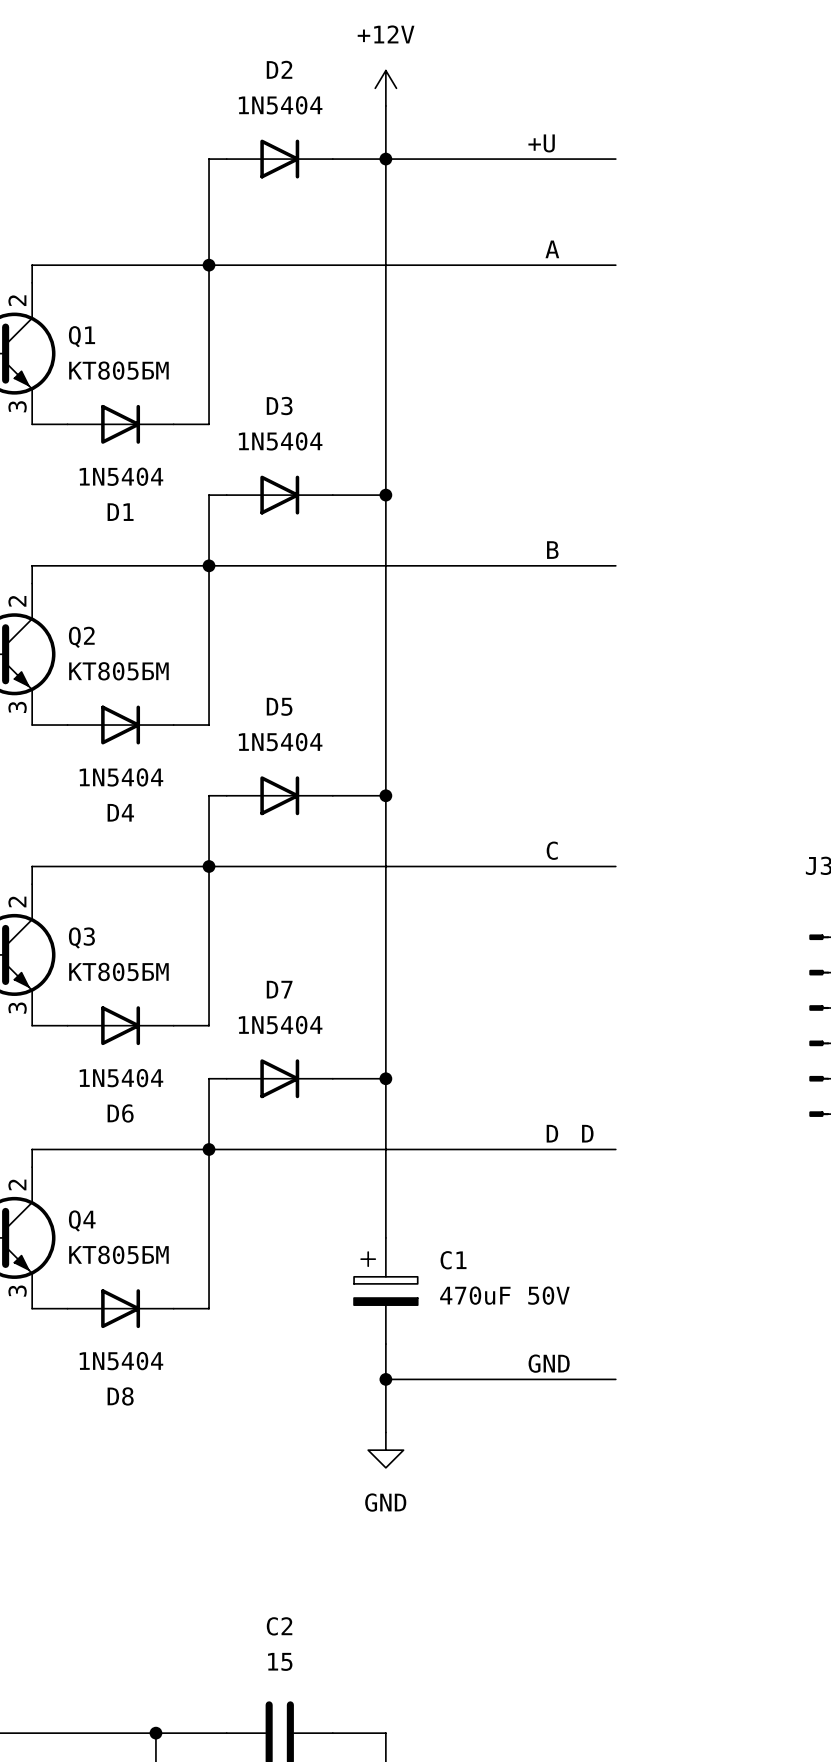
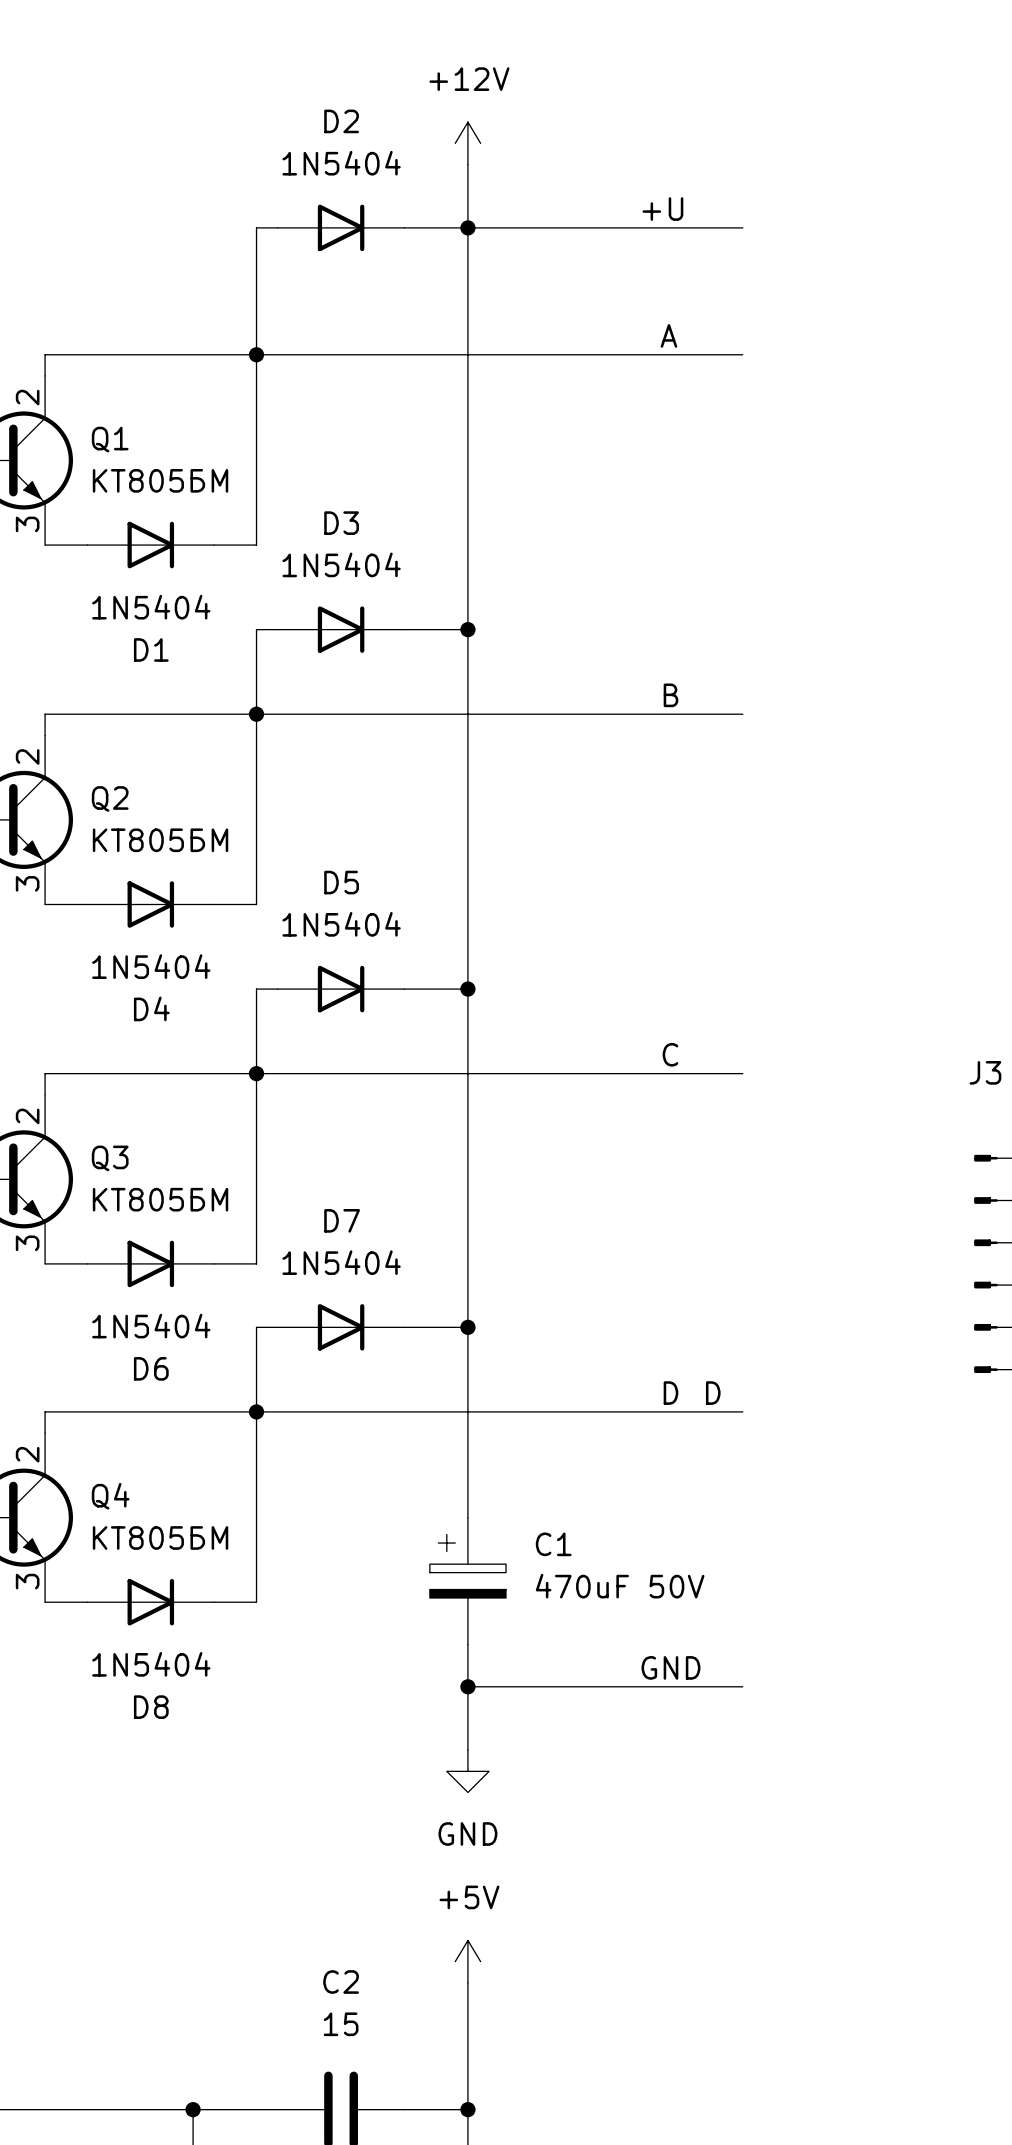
power symbol: none -> +5V (467, 1961)
wire: none -> (467, 1982) (467, 2109)
junction: none -> (467, 2109)

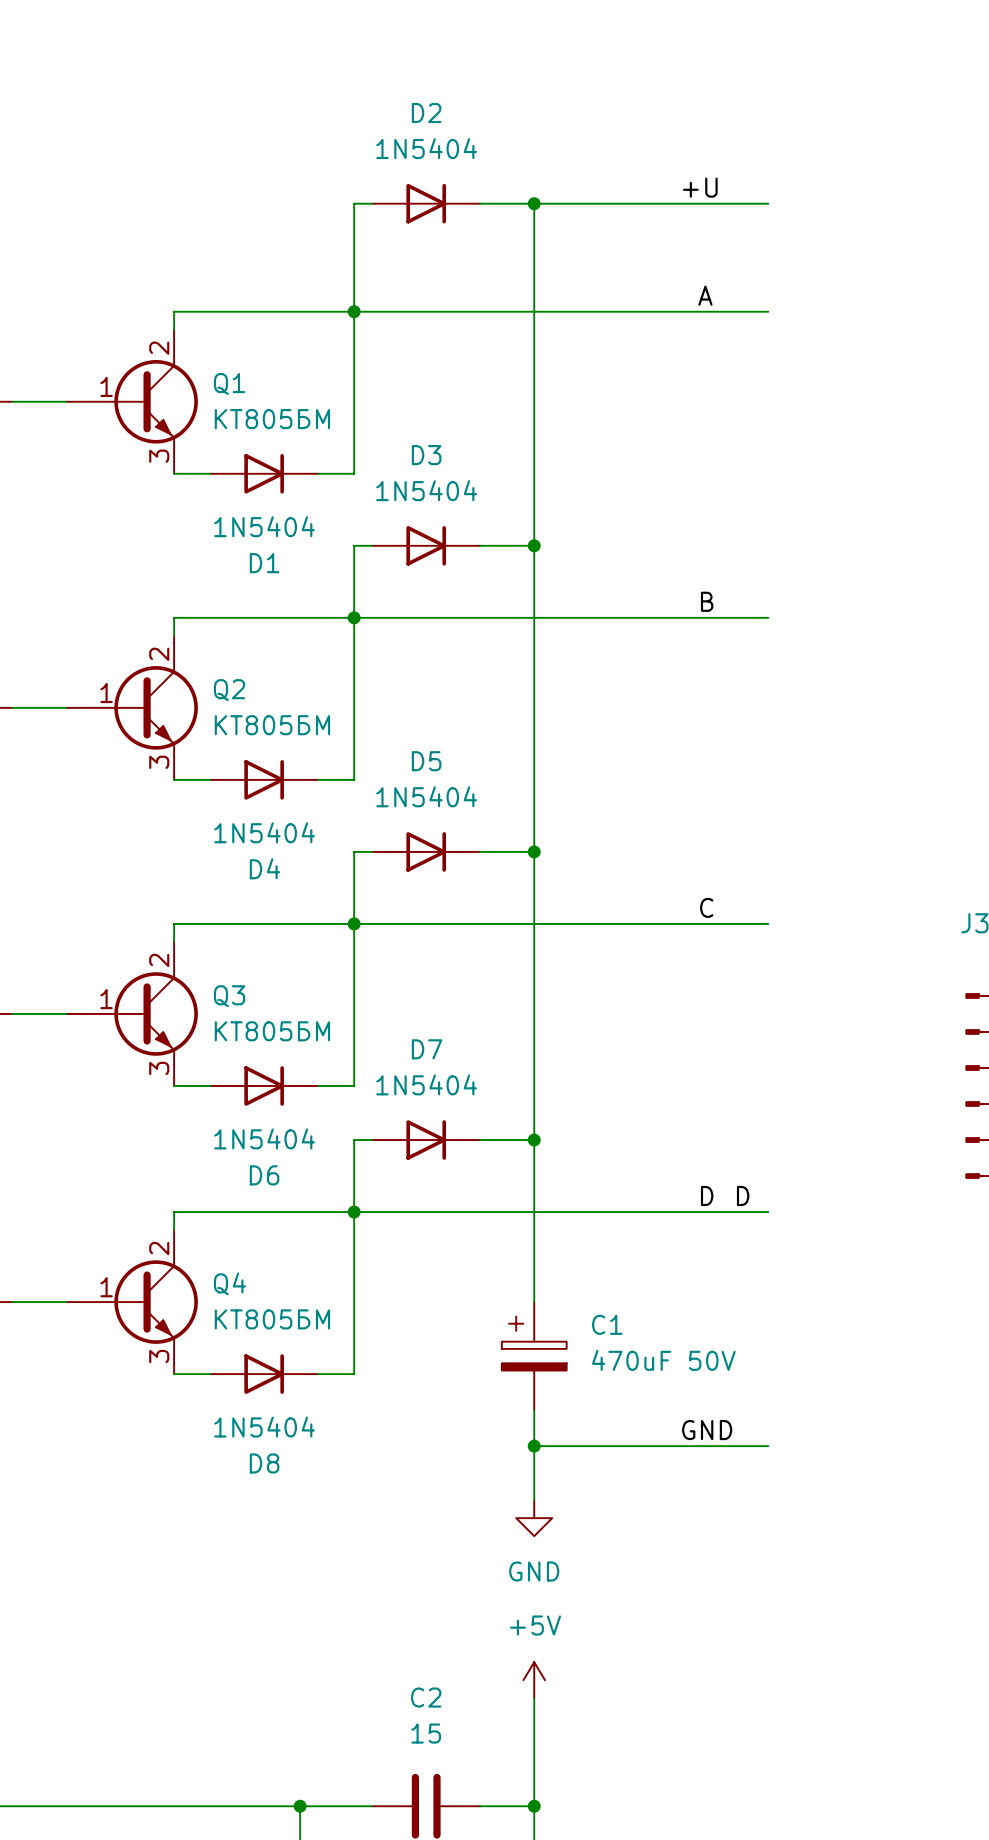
power symbol: +12V (467, 143) -> none
wire: (467, 164) (467, 227) -> none

